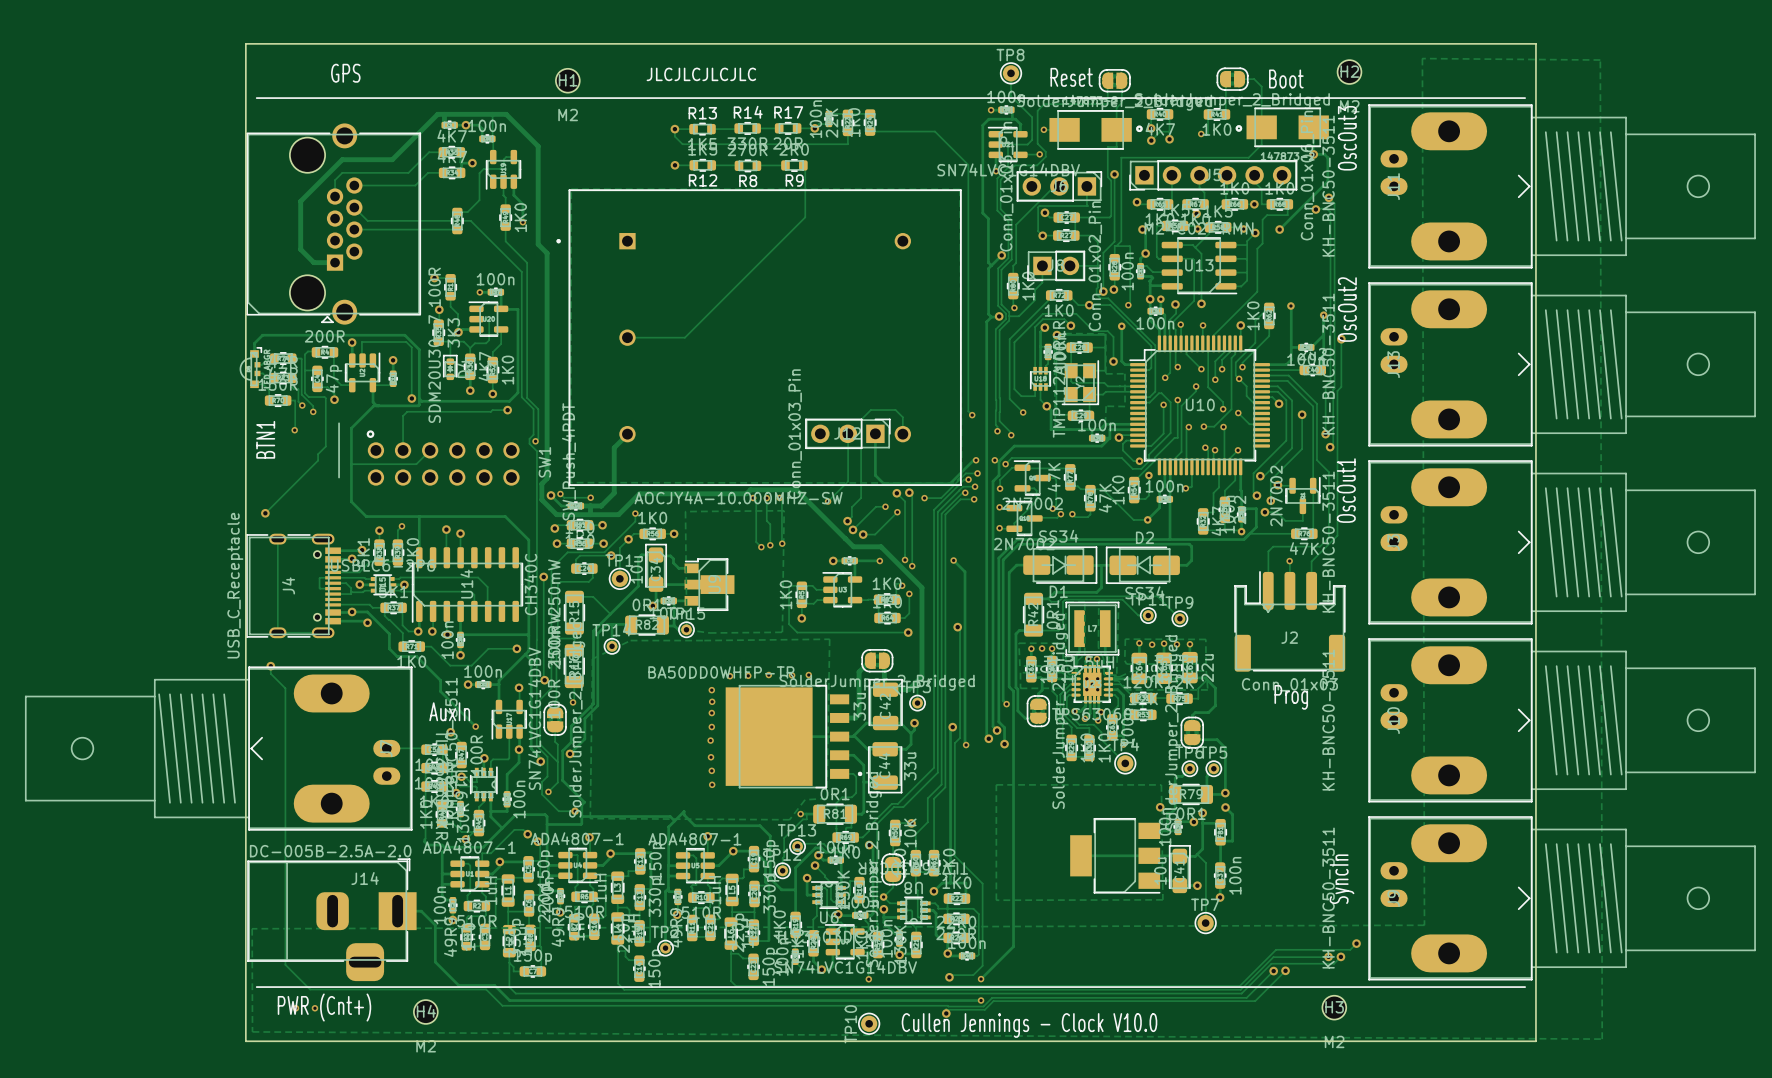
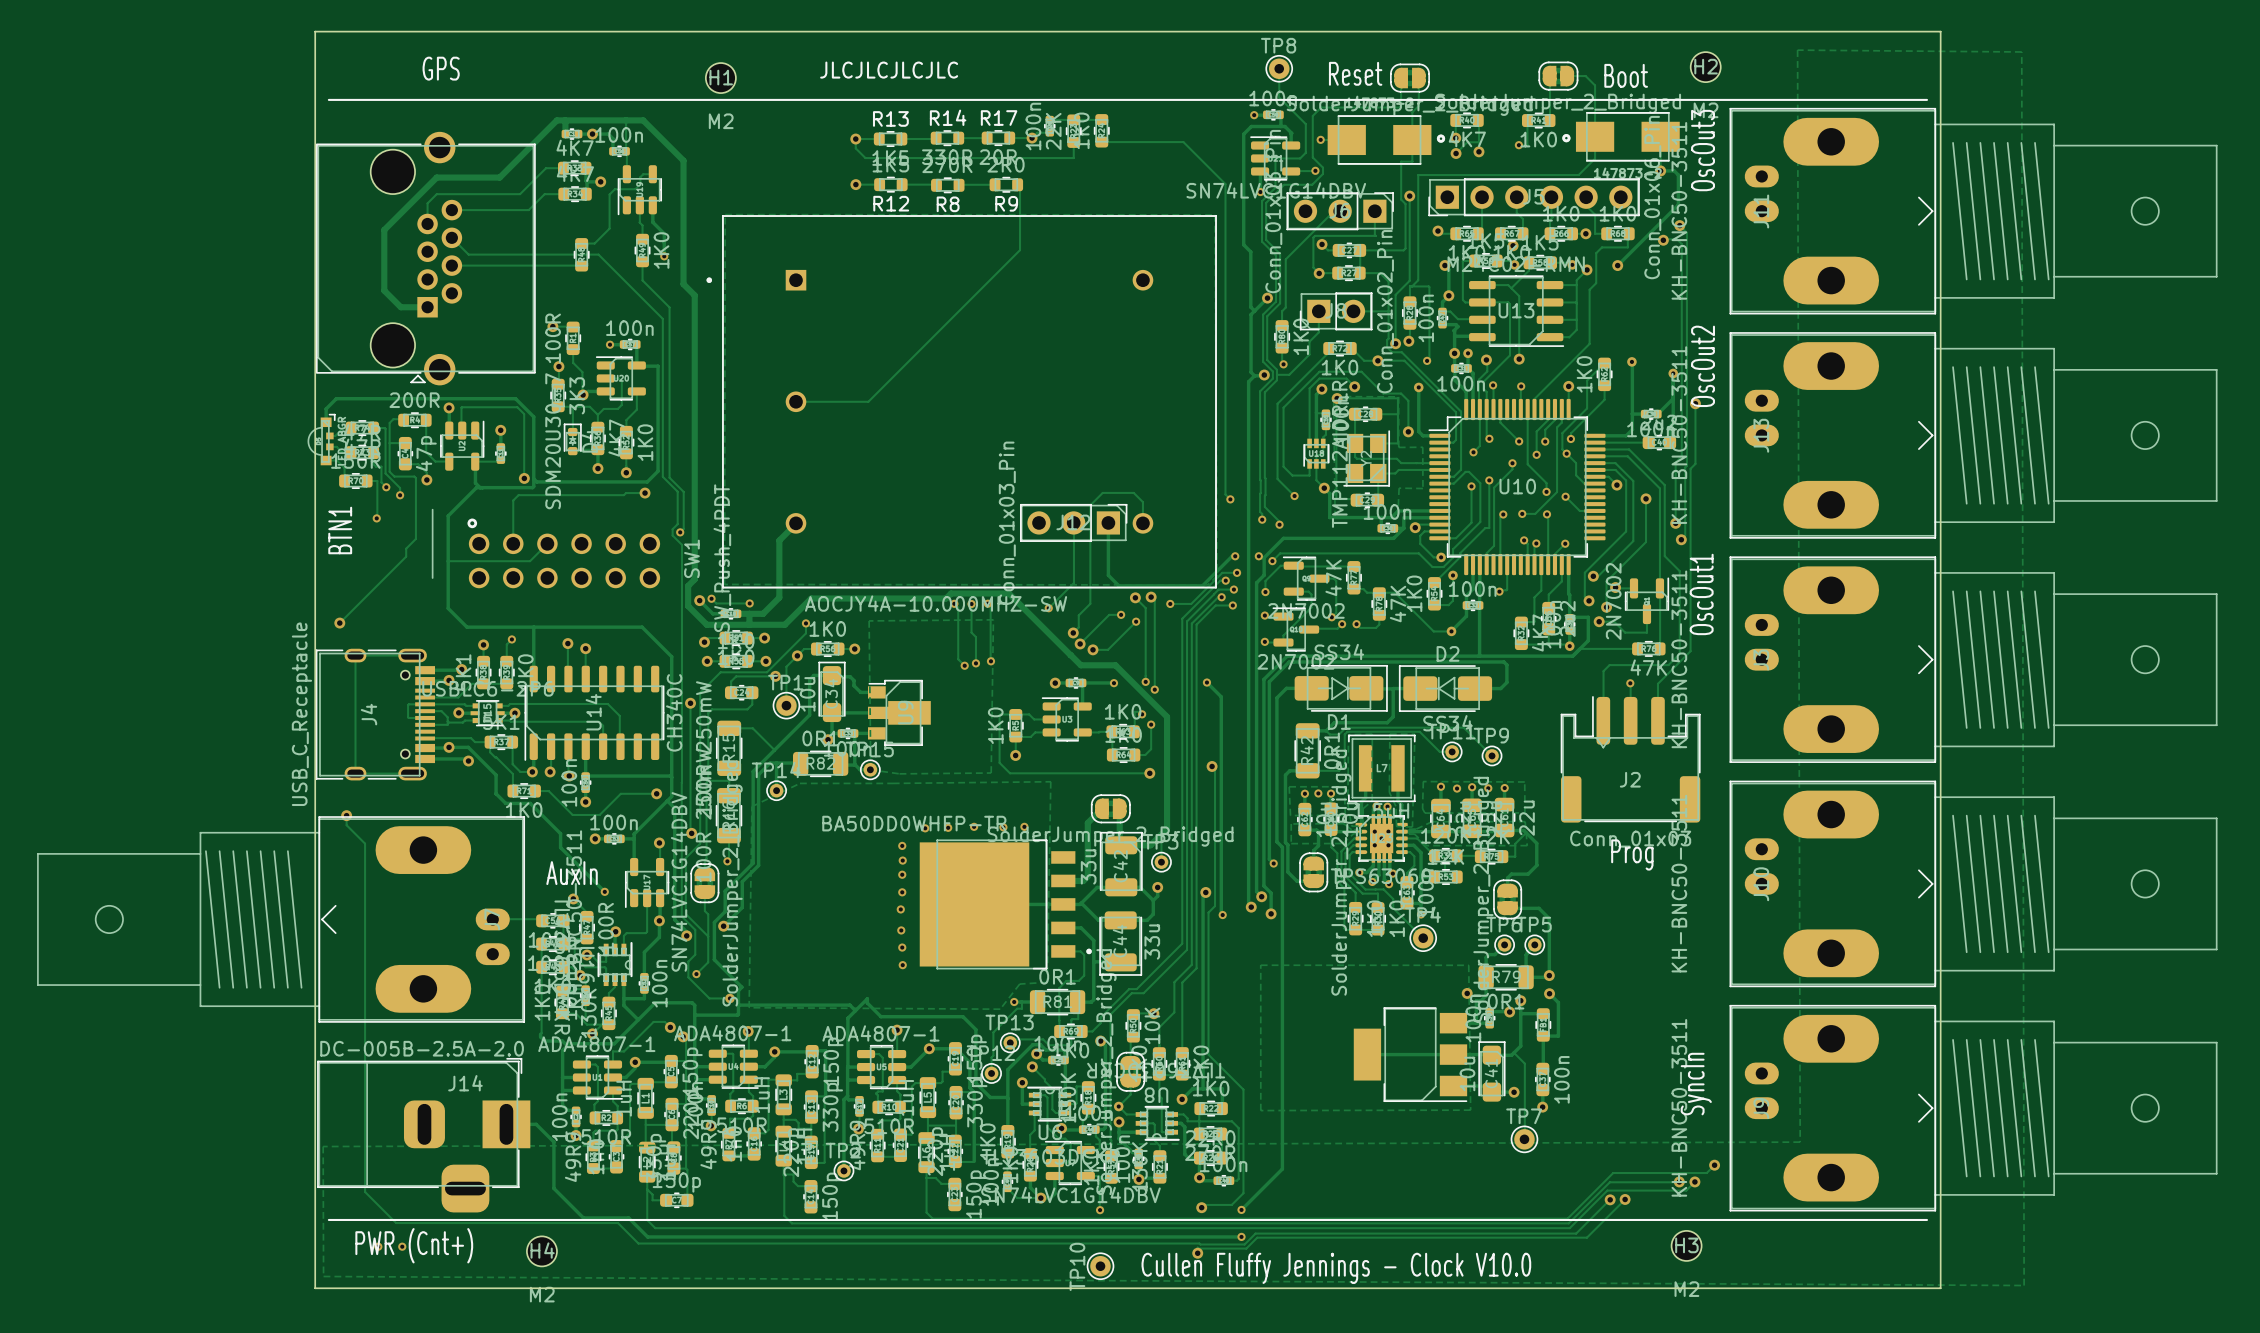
text: Cullen Jennings - Clock V10.0 (1029, 1025) -> Cullen Fluffy Jennings - Clock V10.0 (1336, 1268)

